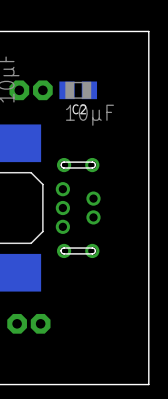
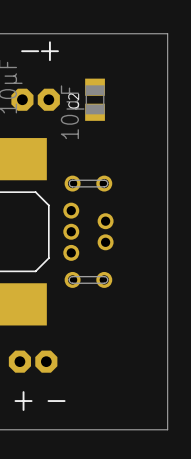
text: none -> - (30, 51)
text: none -> + (49, 51)
C2 rotation: 0° (78, 90) -> 90° clockwise (95, 99)
text: none -> + (23, 401)
text: none -> - (56, 401)

